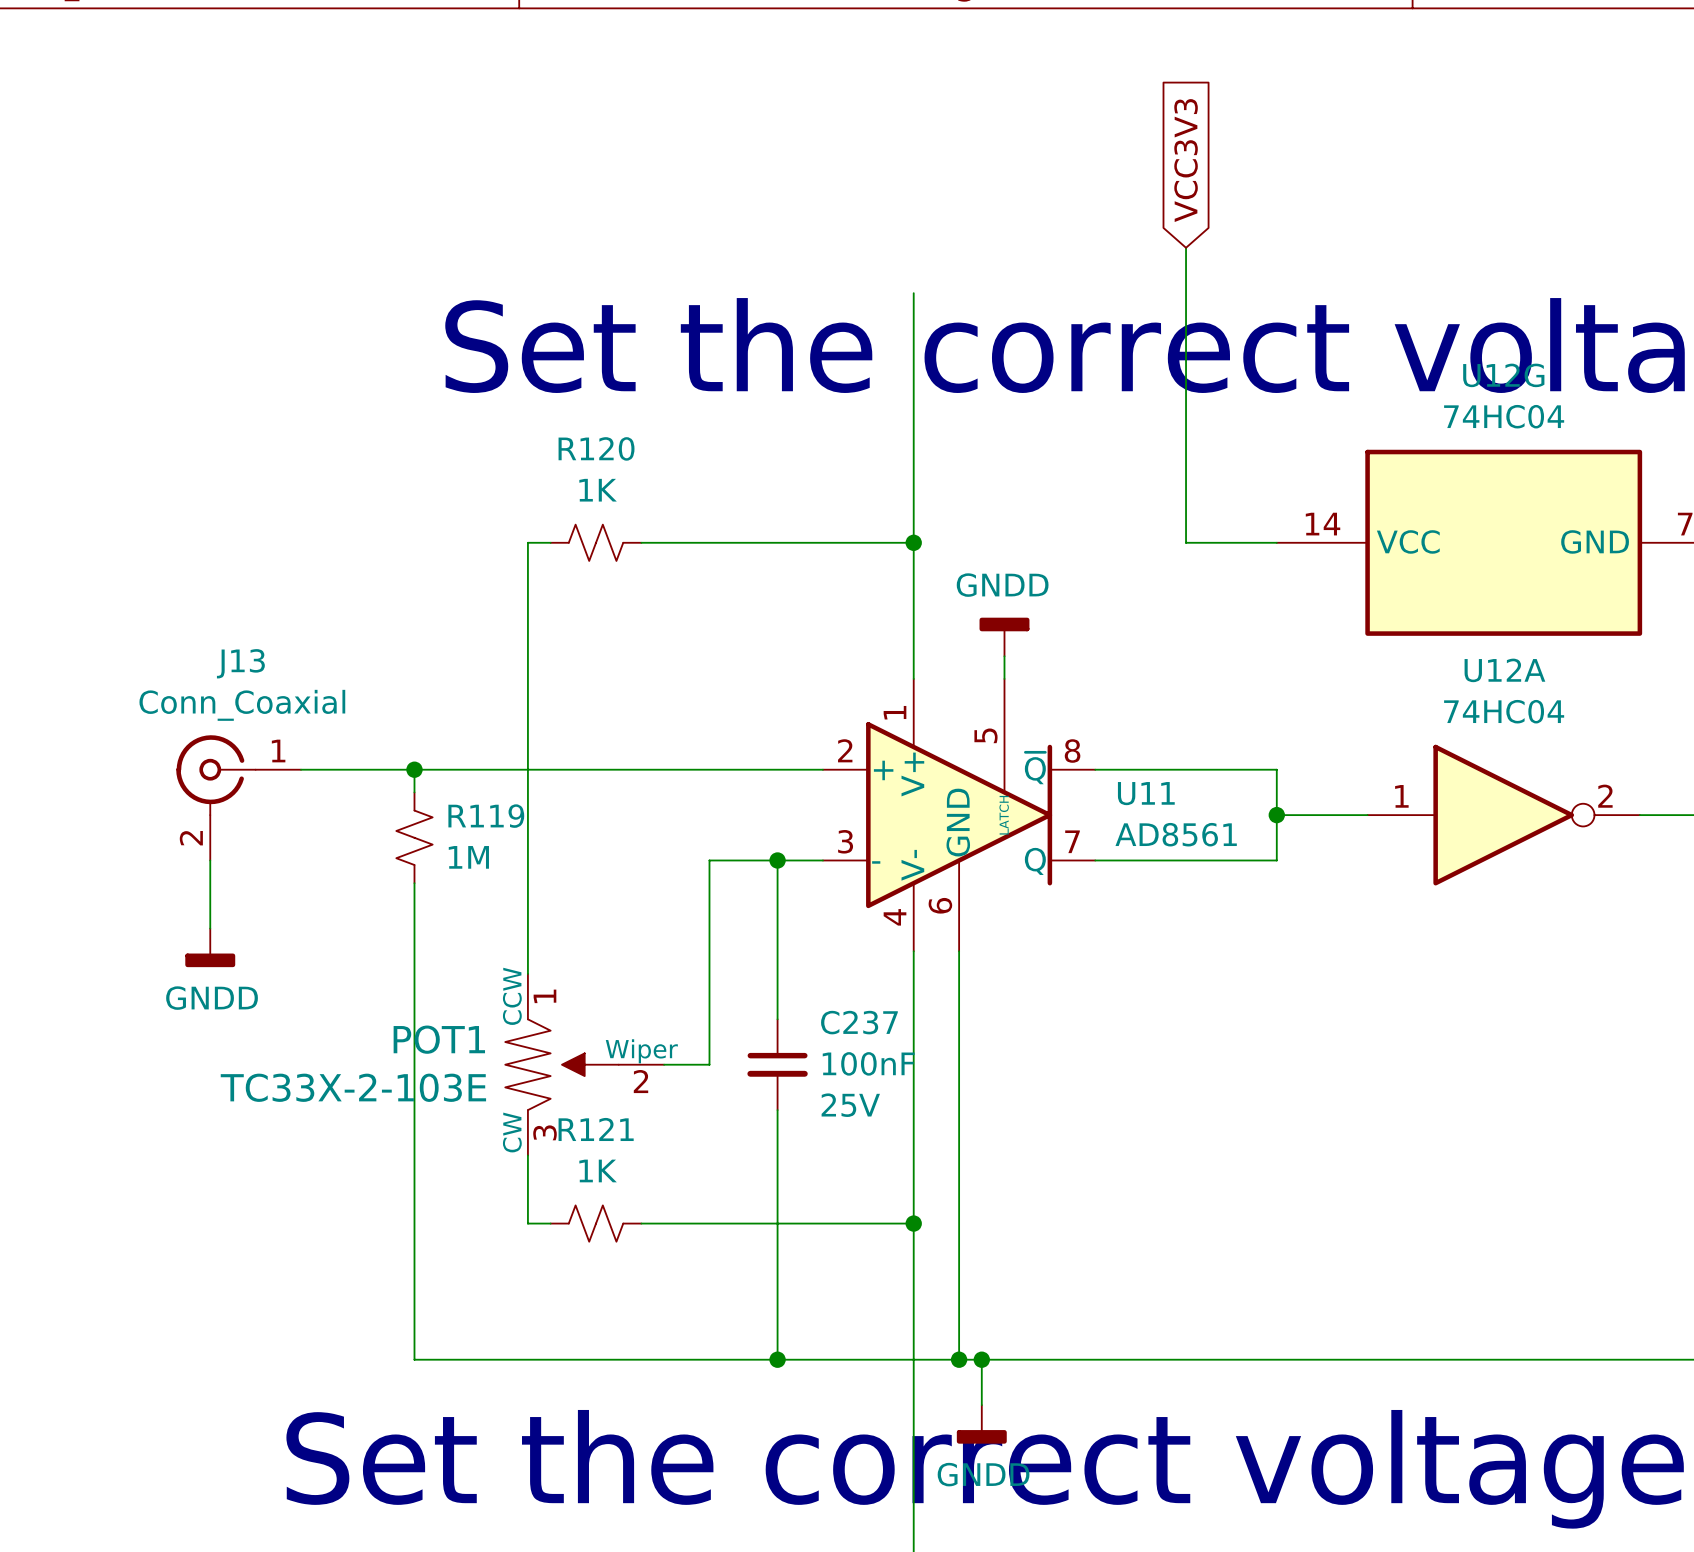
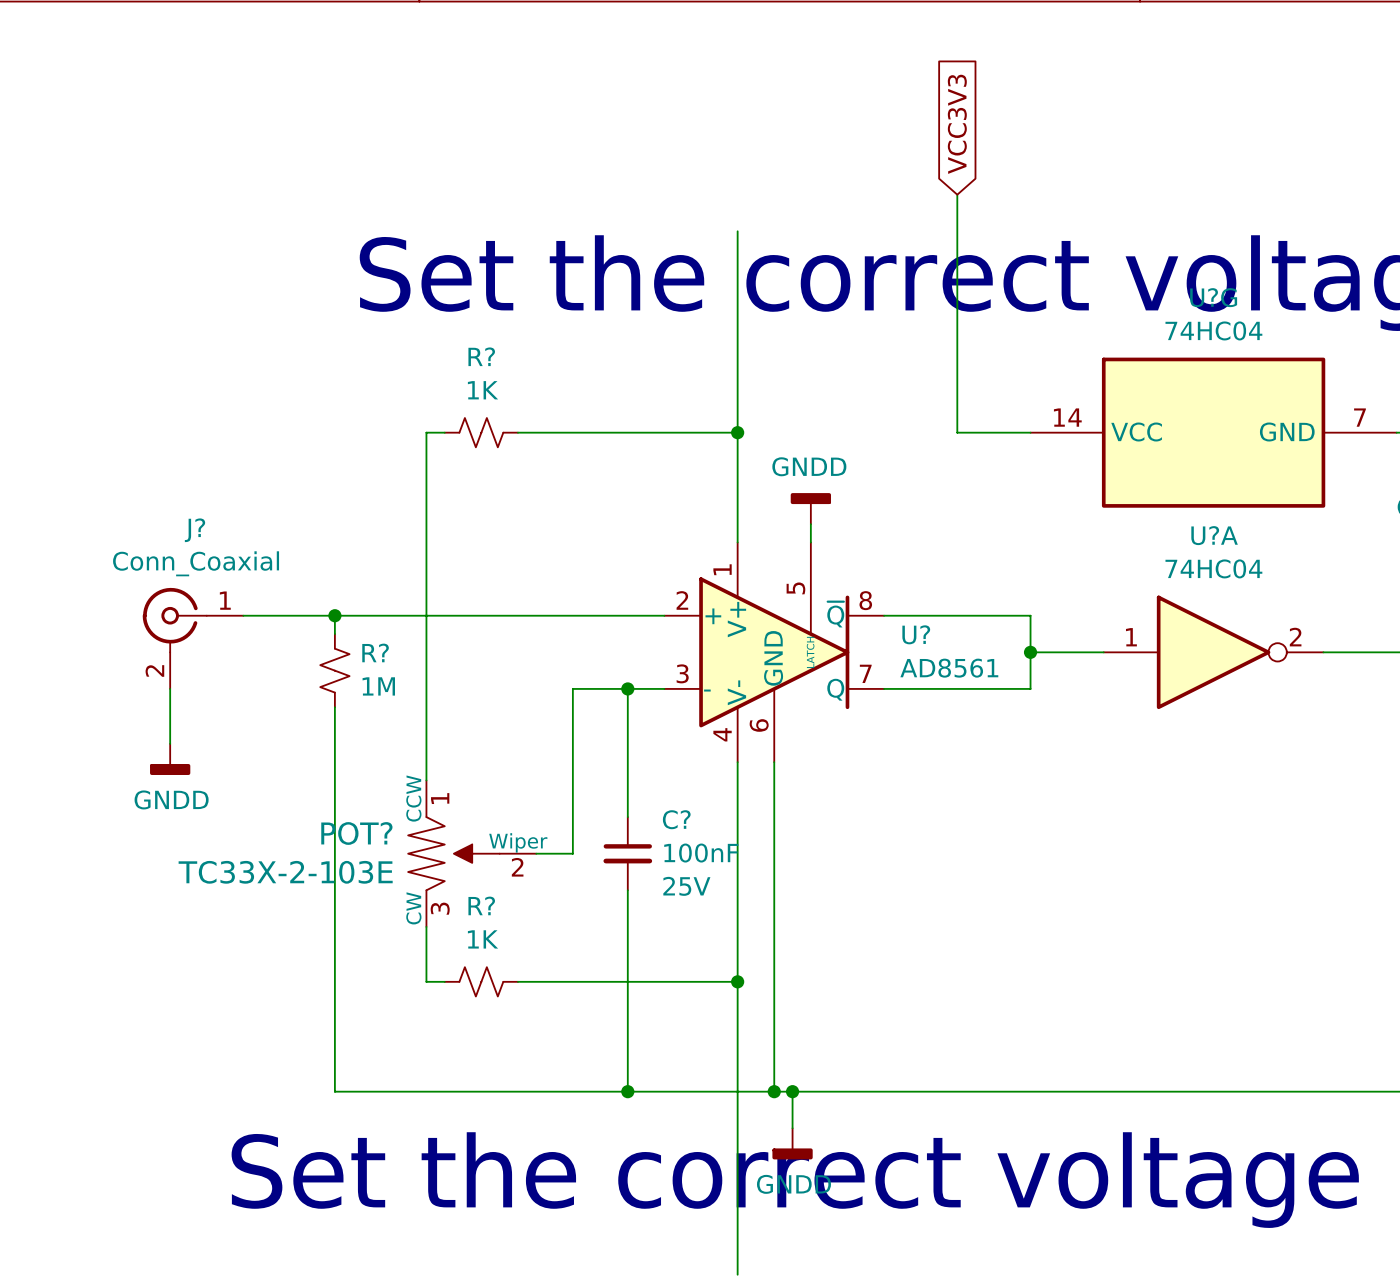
U12G name: U12G (1503, 375) -> U?G (1213, 297)
R120 name: R120 (596, 448) -> R? (481, 356)
J13 name: J13 (240, 663) -> J? (195, 530)
U12A name: U12A (1504, 670) -> U?A (1214, 535)
U11 name: U11 (1146, 793) -> U? (916, 634)
R119 name: R119 (486, 816) -> R? (375, 652)
C237 name: C237 (859, 1022) -> C? (676, 819)
POT1 name: POT1 (439, 1039) -> POT? (356, 833)
R121 name: R121 (596, 1129) -> R? (481, 905)

